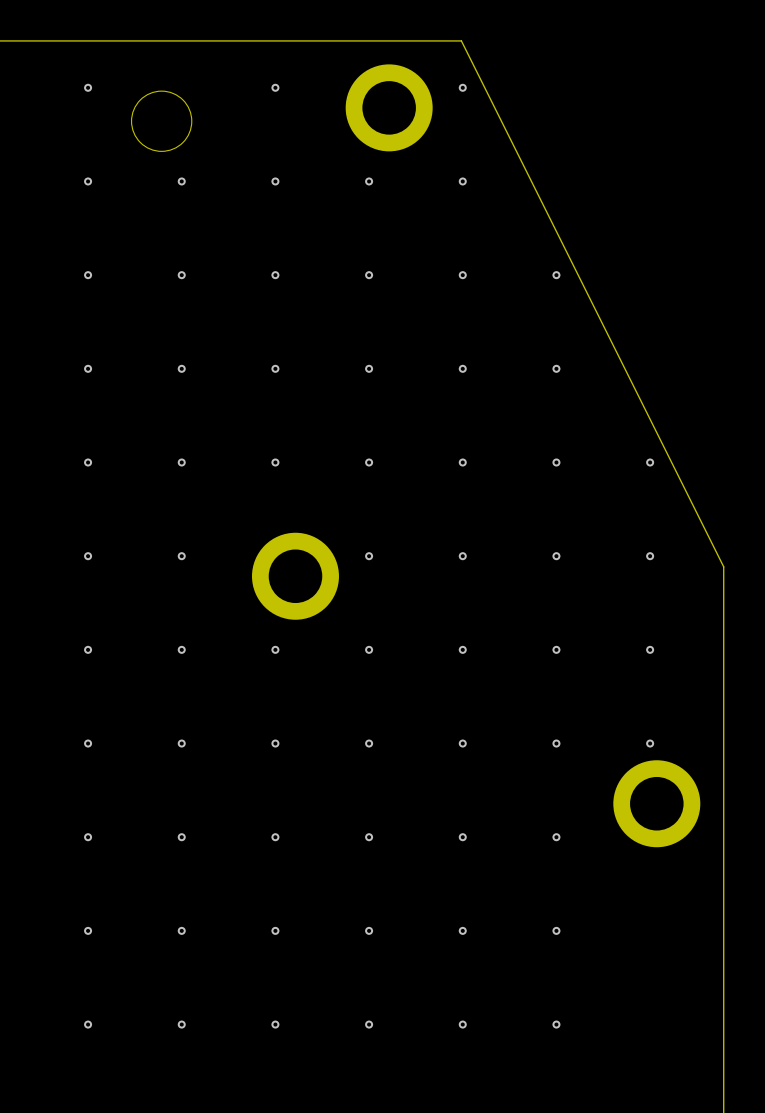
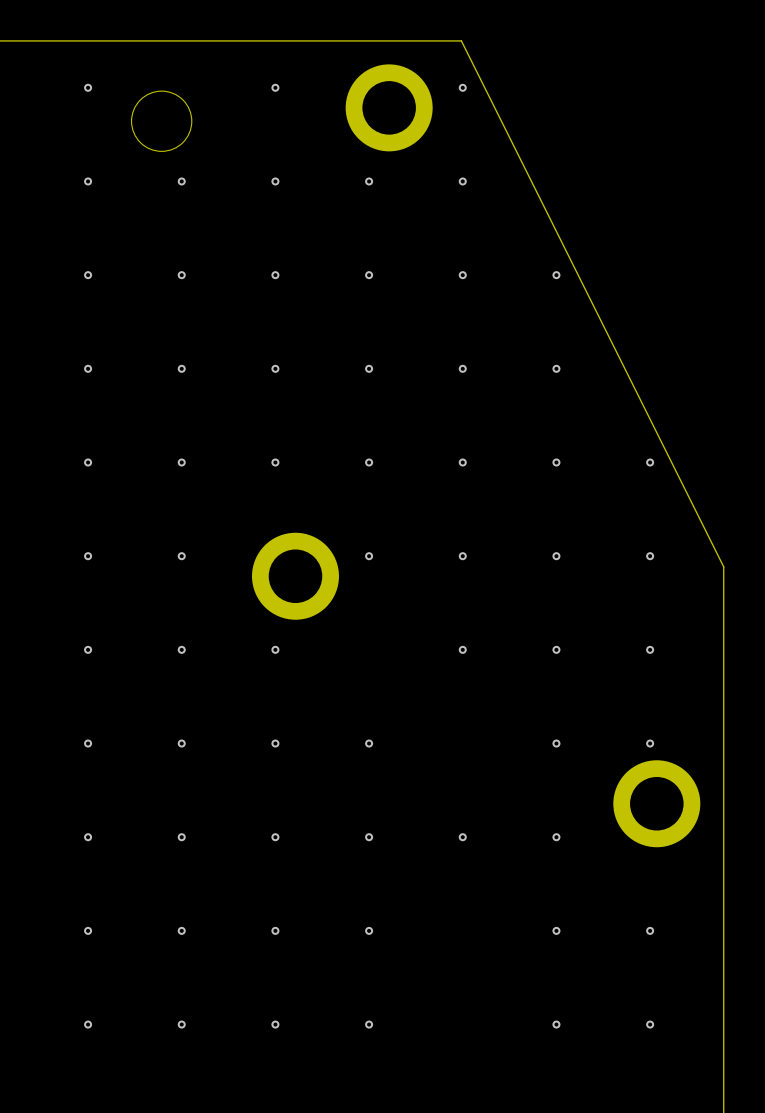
via: (369, 649) -> none
via: (462, 743) -> none
via: (462, 930) -> none
via: none -> (650, 930)
via: (462, 1024) -> none
via: none -> (650, 1024)

